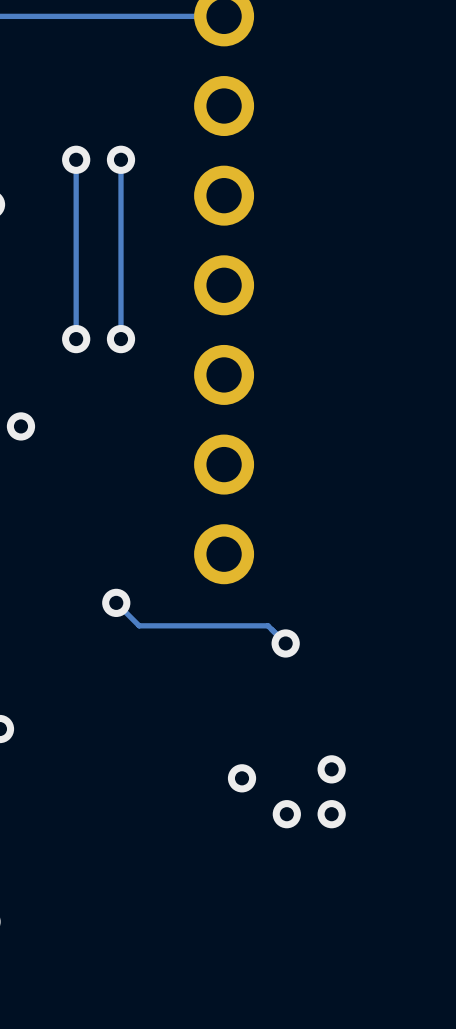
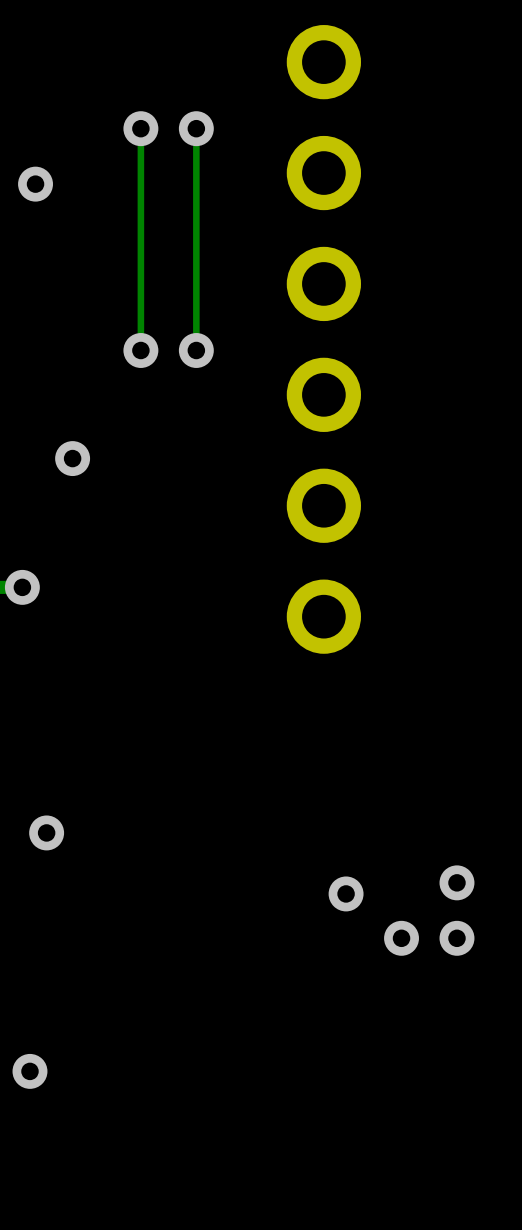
track: (116, 602) (139, 625) (268, 625) (285, 643) -> none
via: (116, 602) -> none
via: (285, 643) -> none

